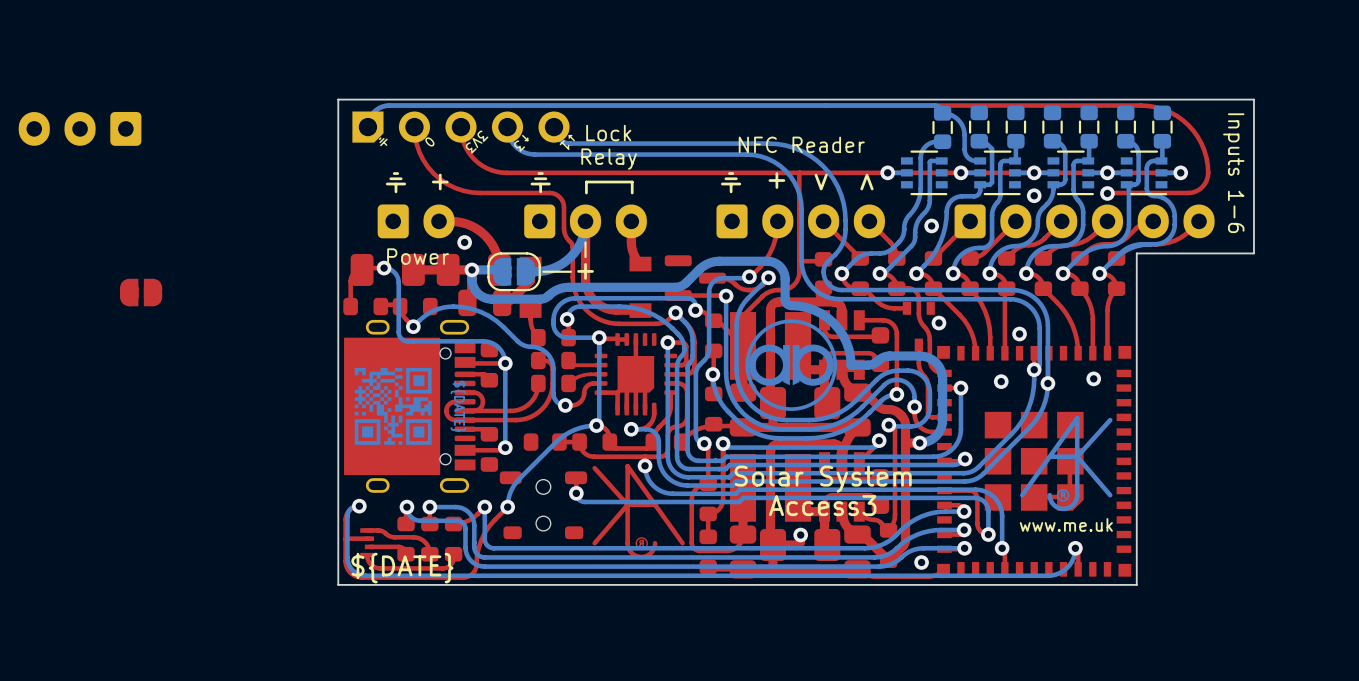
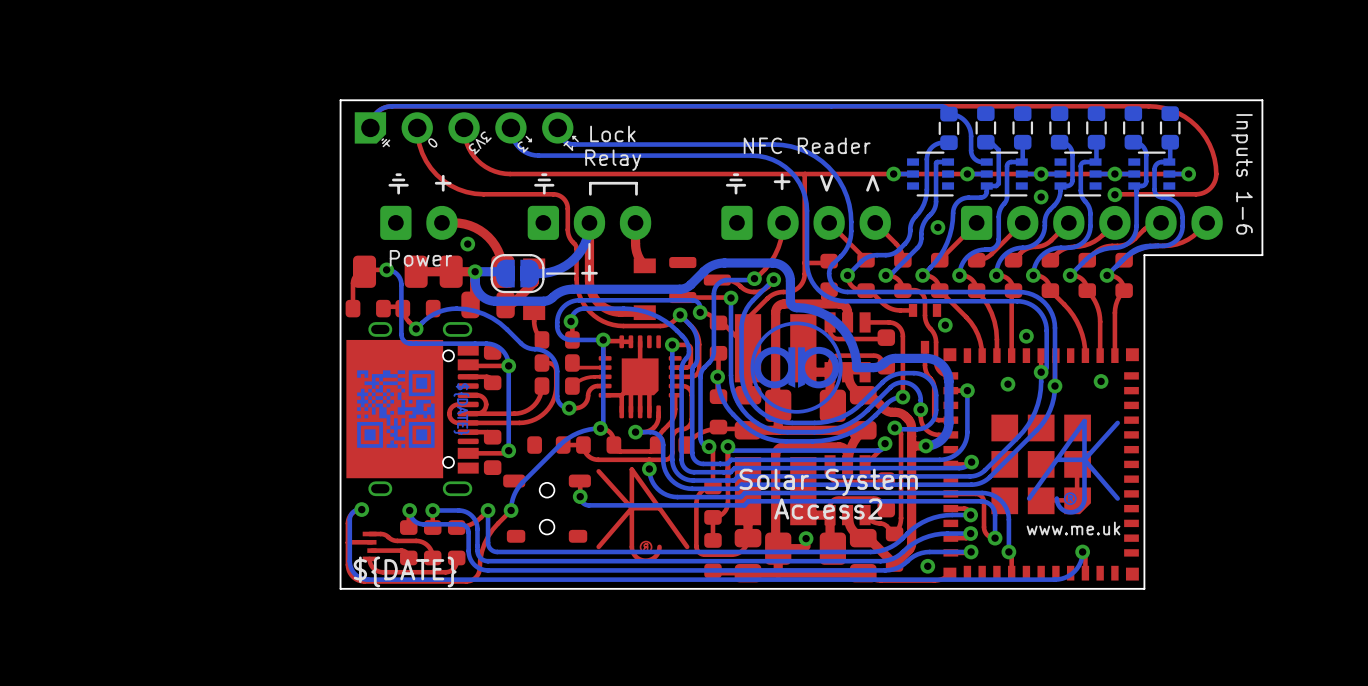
part: (80, 128) -> none
part: (141, 292) -> none
text: Access3 (822, 505) -> Access2 (828, 508)

